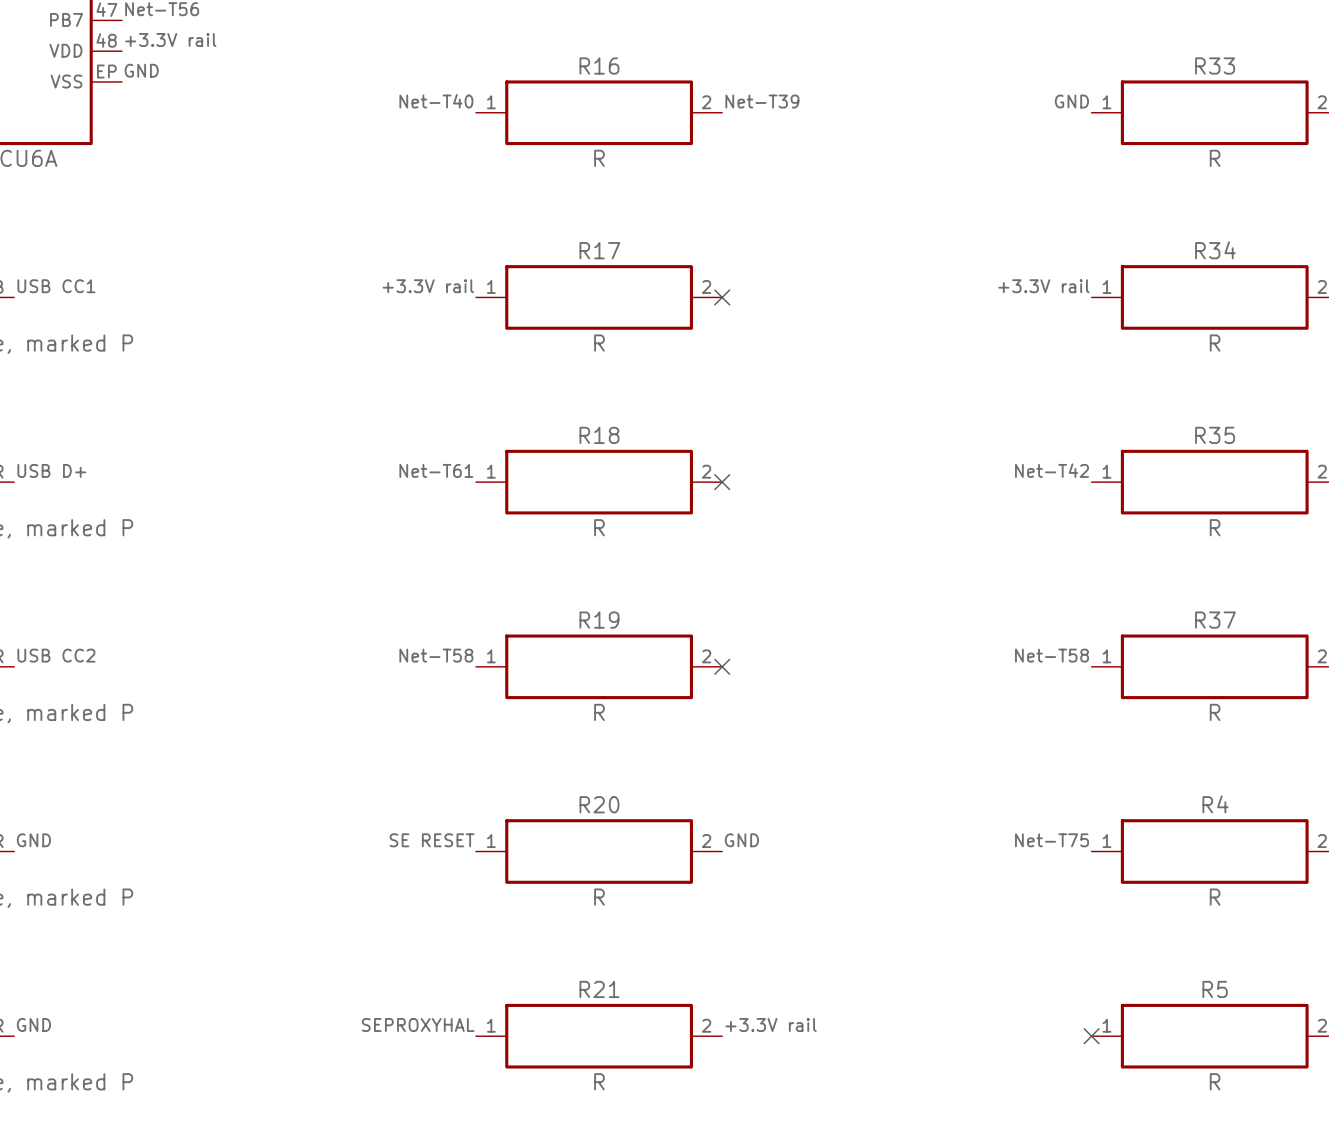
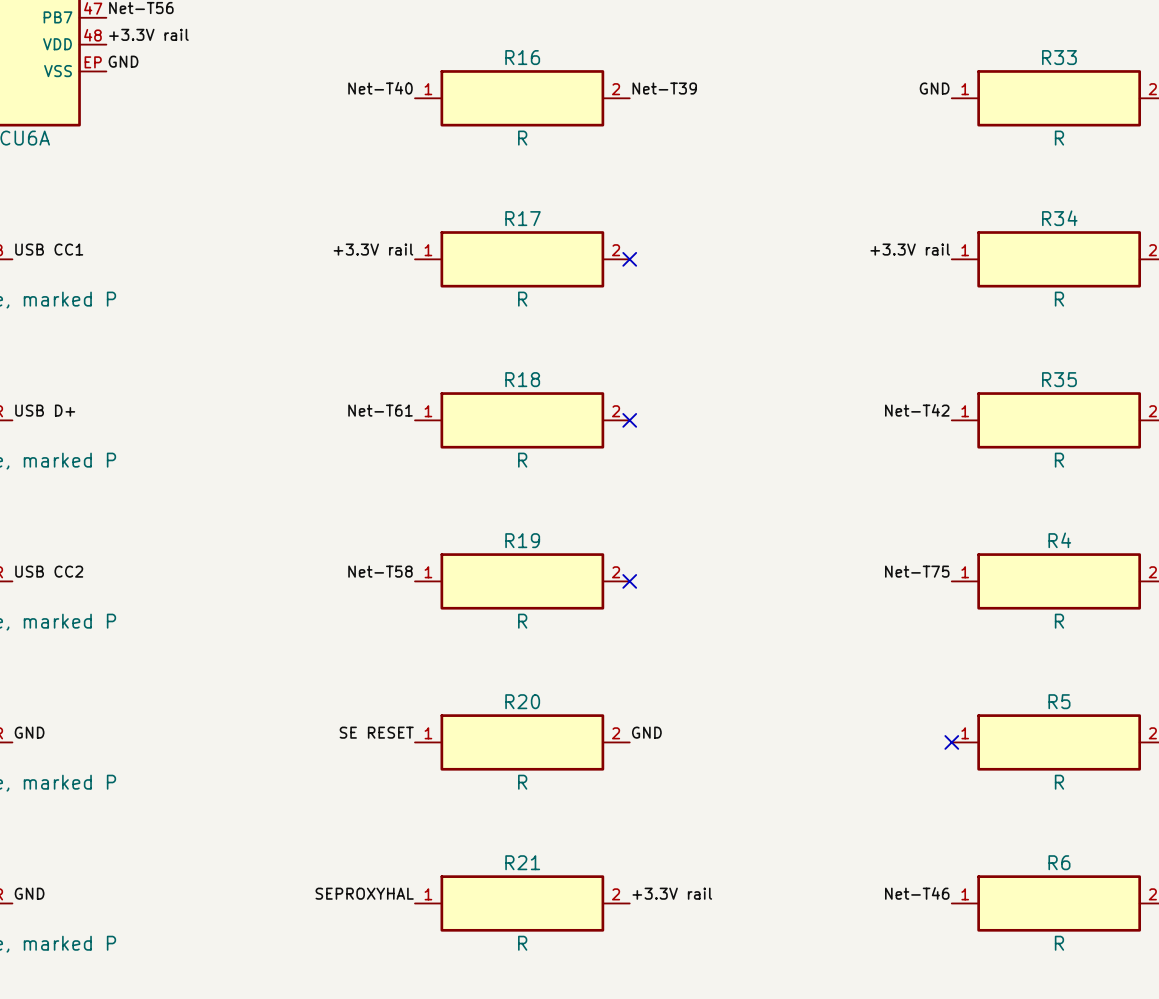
R37 name: R37 (1215, 620) -> R4 (1059, 540)
label: Net-T58 (1052, 655) -> Net-T75 (917, 571)
R4 name: R4 (1215, 804) -> R5 (1059, 701)
label: Net-T75 (1052, 840) -> none
no-connect mark: none -> (951, 742)
R5 name: R5 (1215, 989) -> R6 (1059, 862)
label: none -> Net-T46 (917, 893)
no-connect mark: (1091, 1036) -> none

